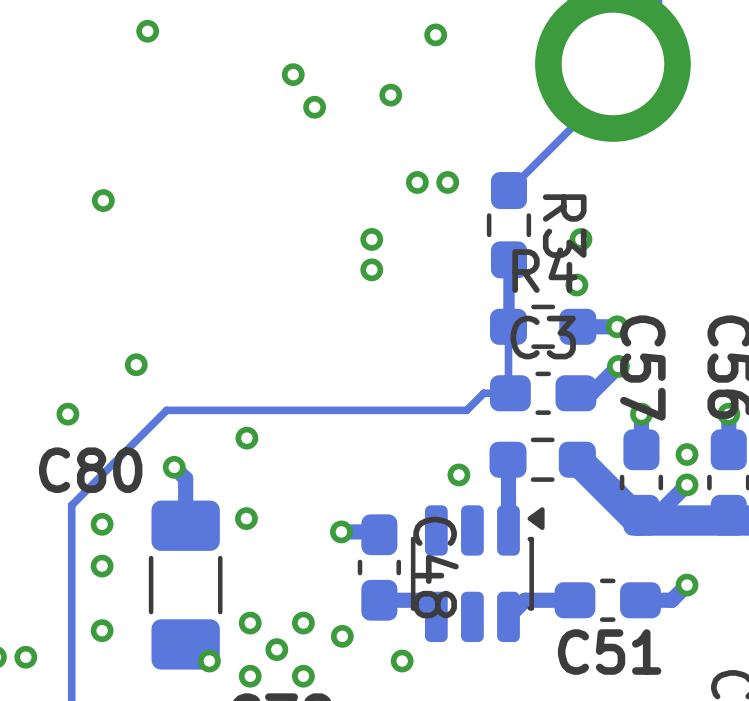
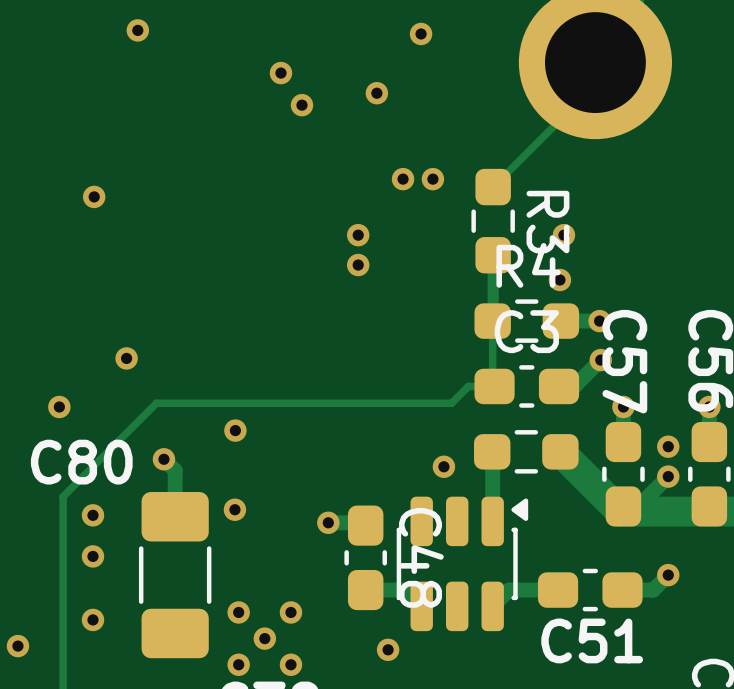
via: (342, 636) -> none
via: (209, 661) -> none

